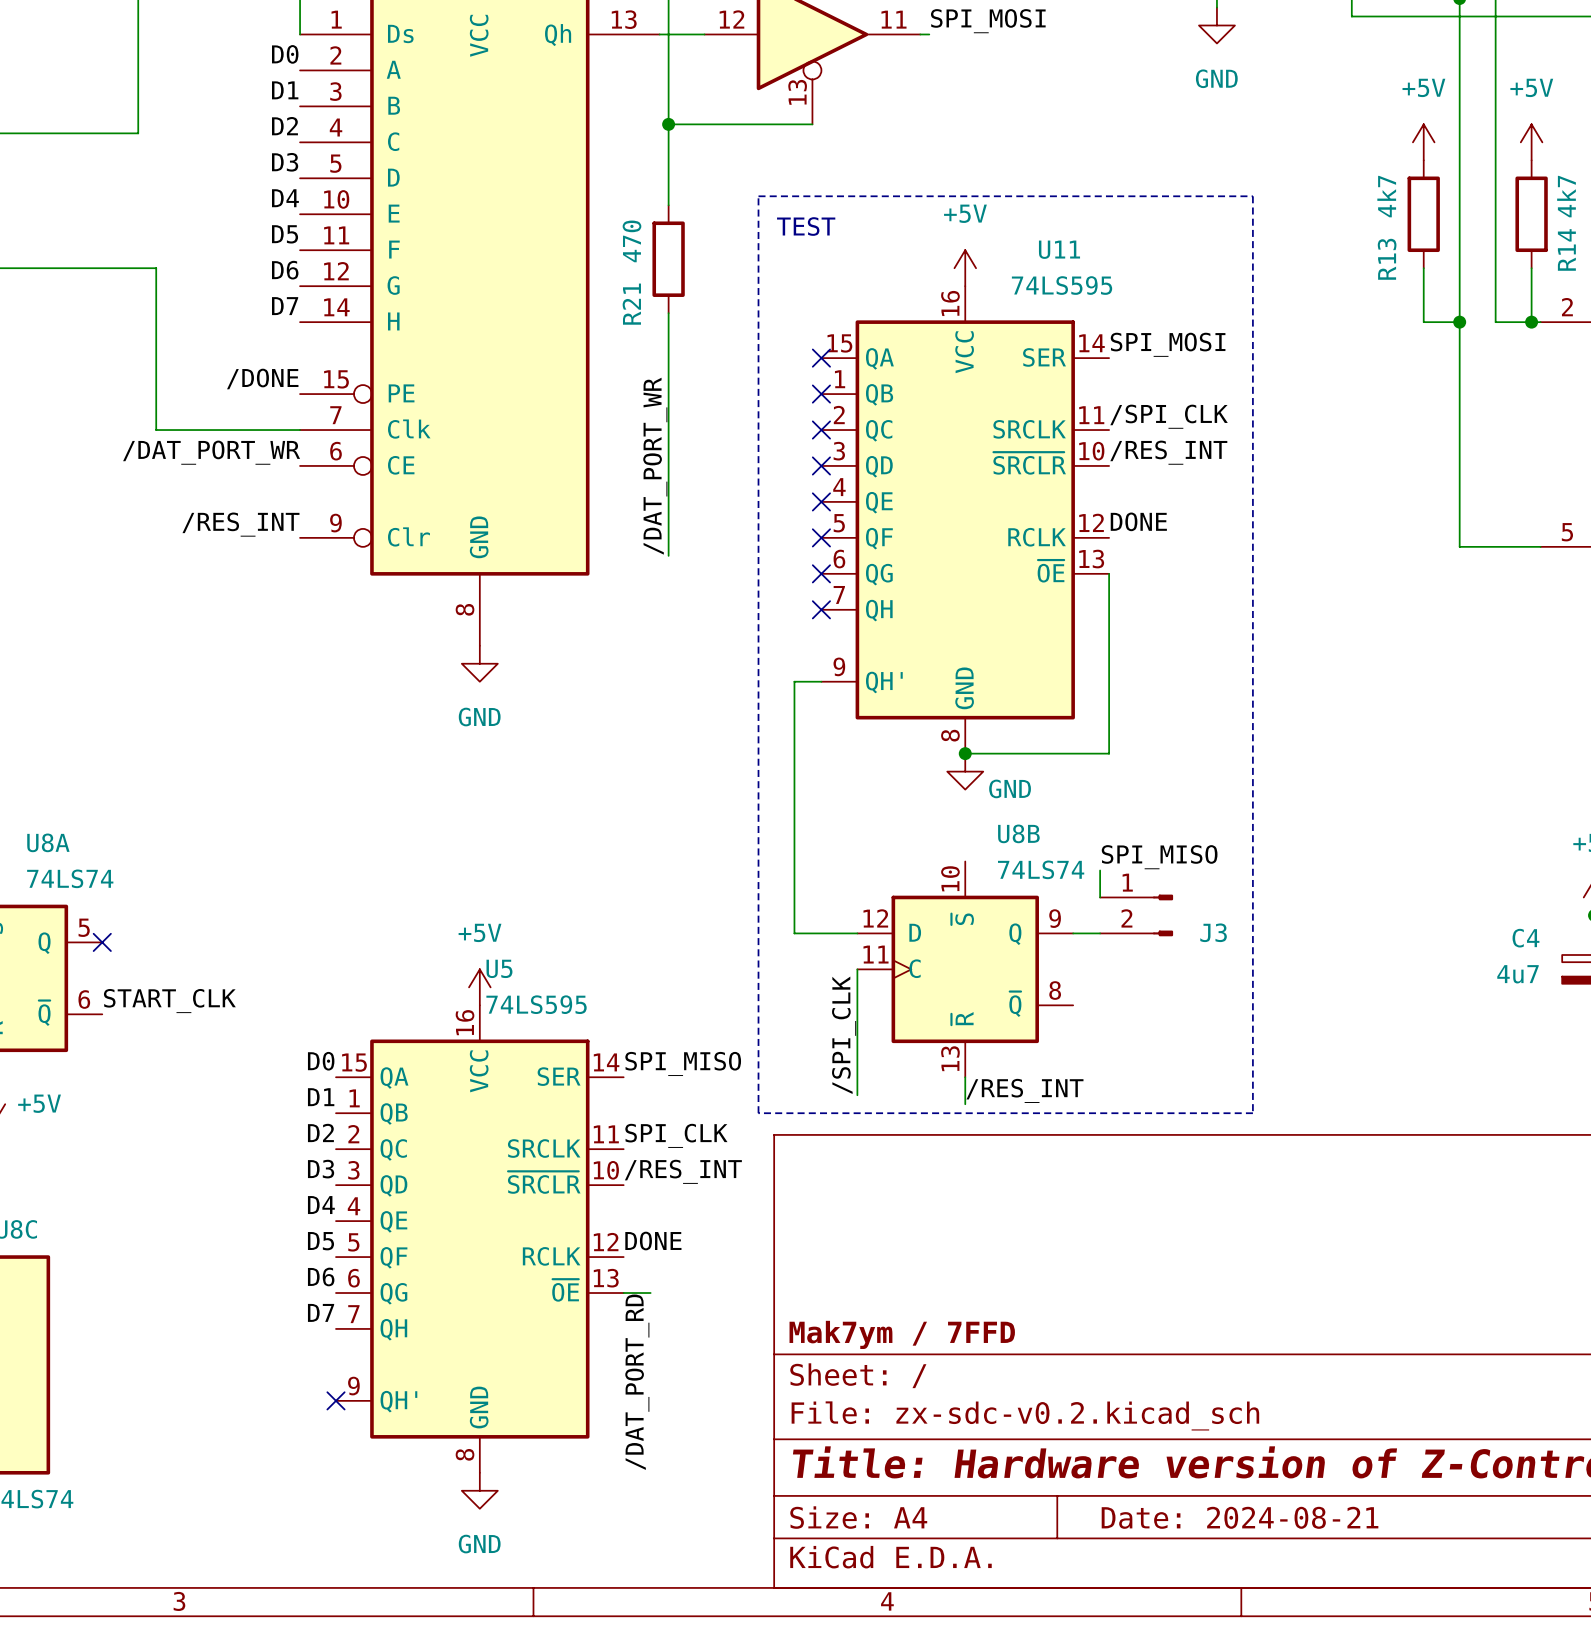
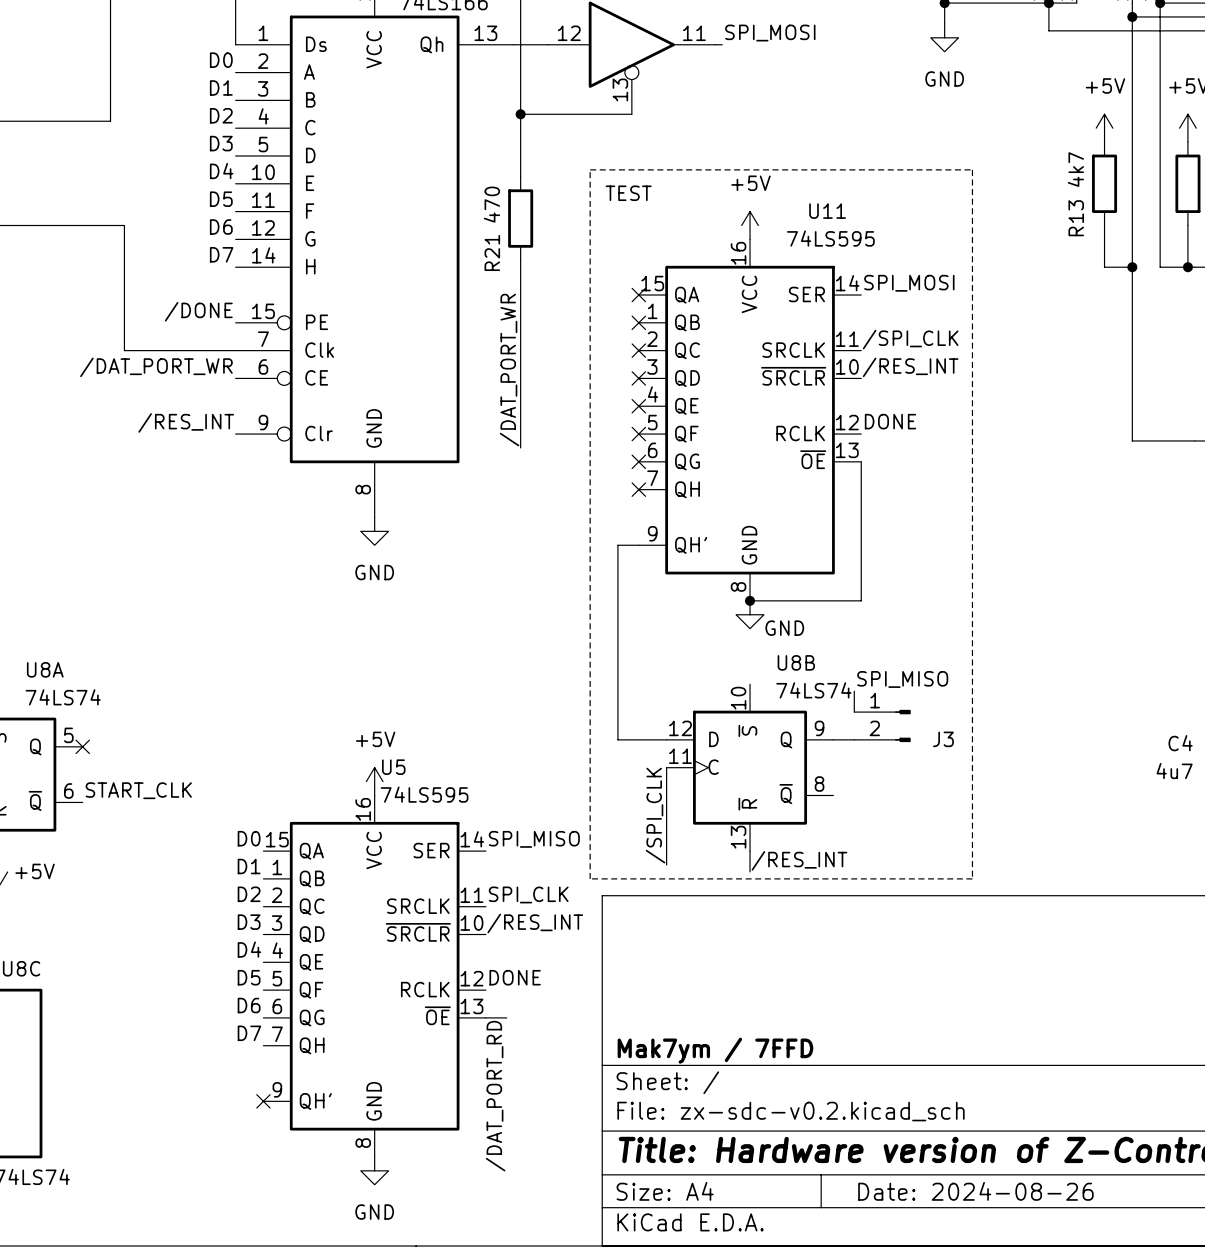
title block: Date: 2024-08-21 (1240, 1517) -> Date: 2024-08-26 (975, 1191)

